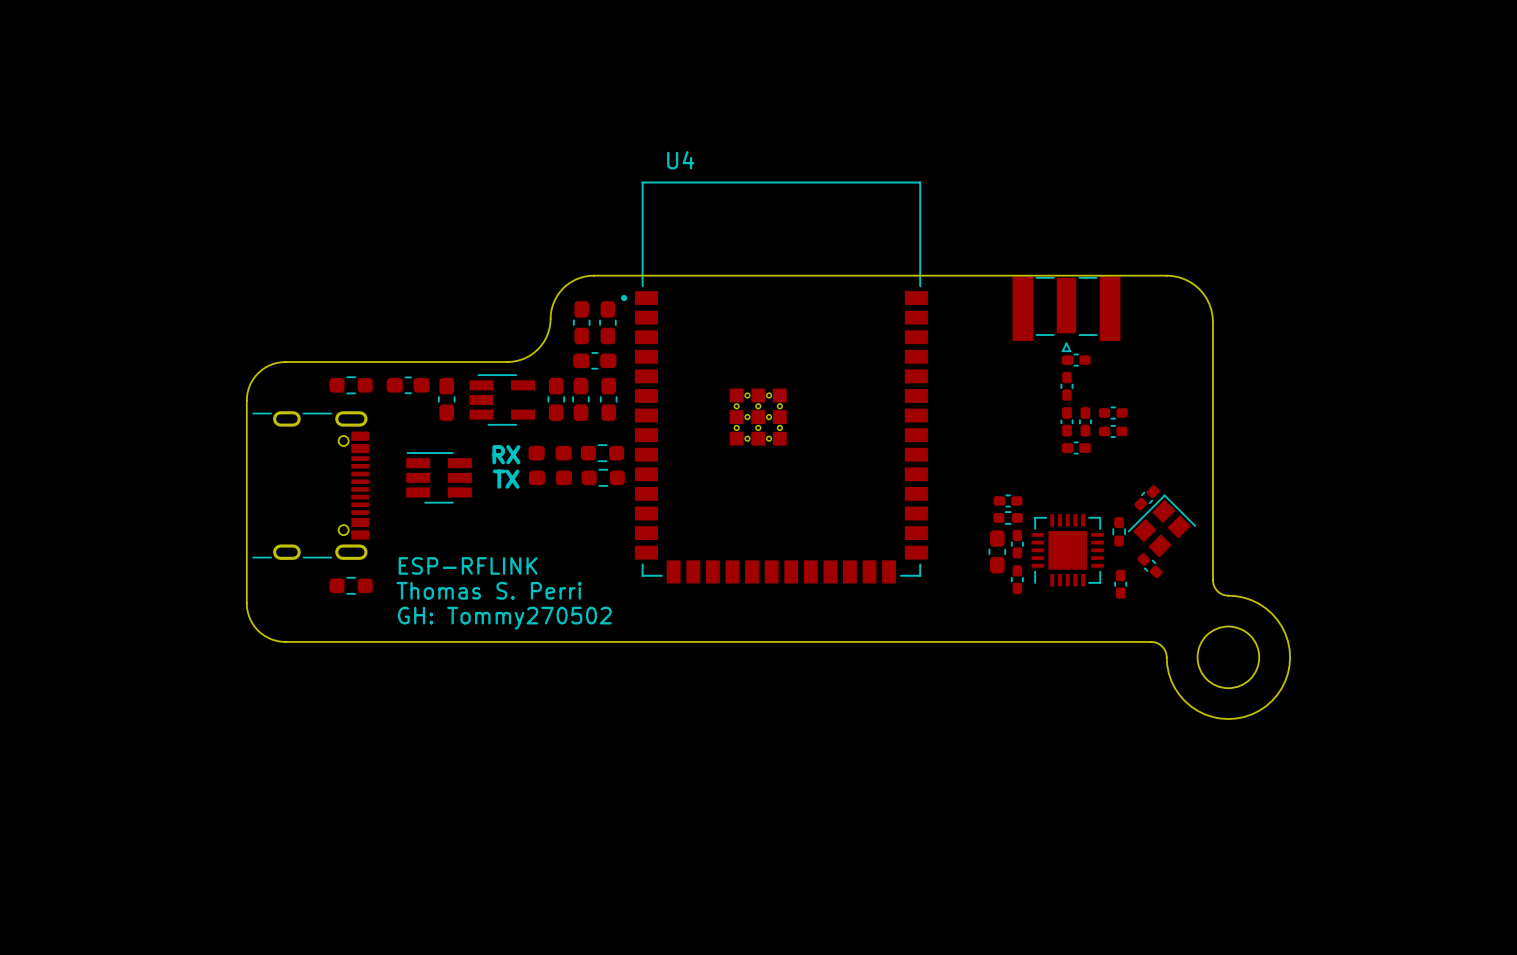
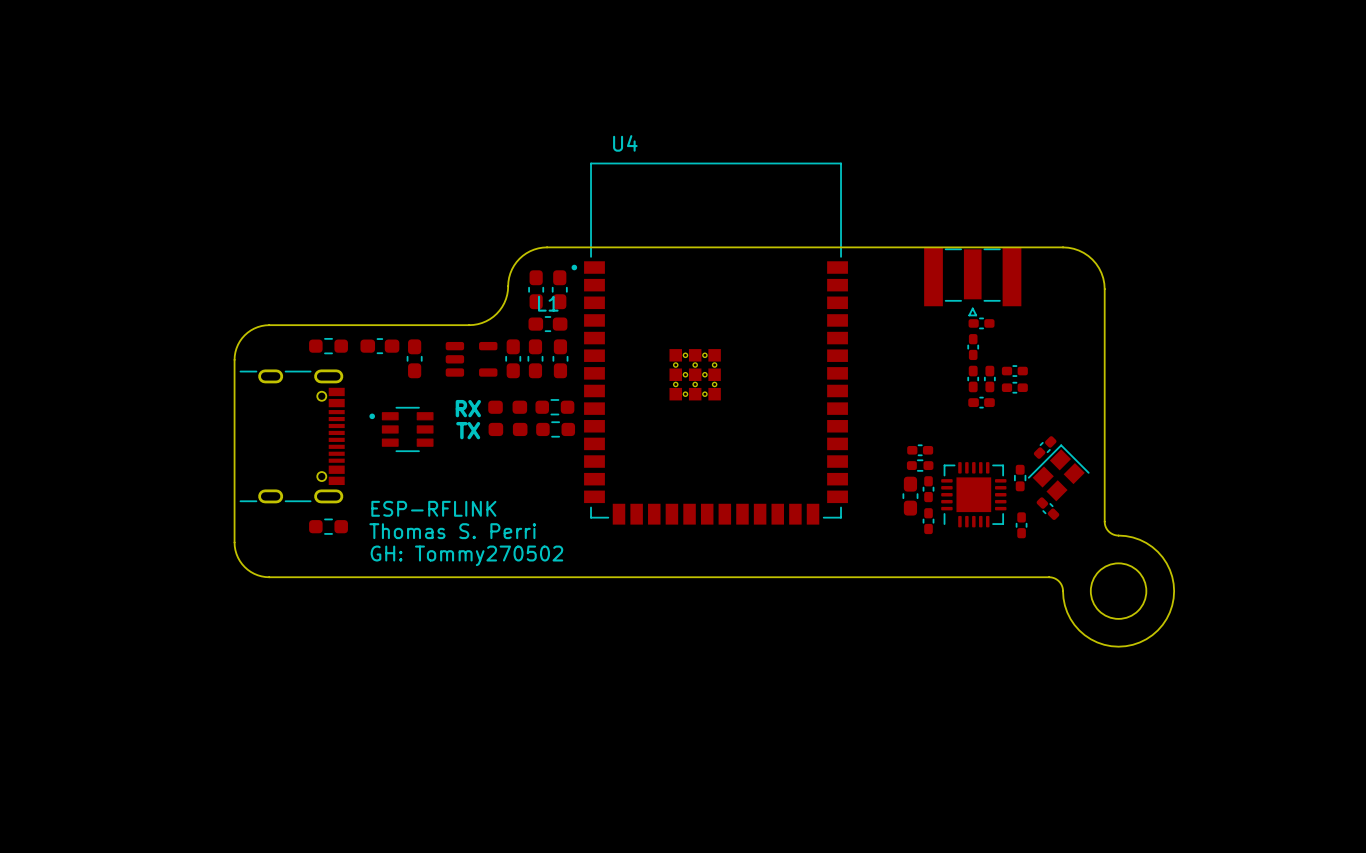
L1 name: none -> L1 (548, 303)
part footprint: [469, 374, 536, 426] -> [445, 341, 498, 377]
part footprint: [406, 452, 472, 504] -> [369, 406, 434, 453]

